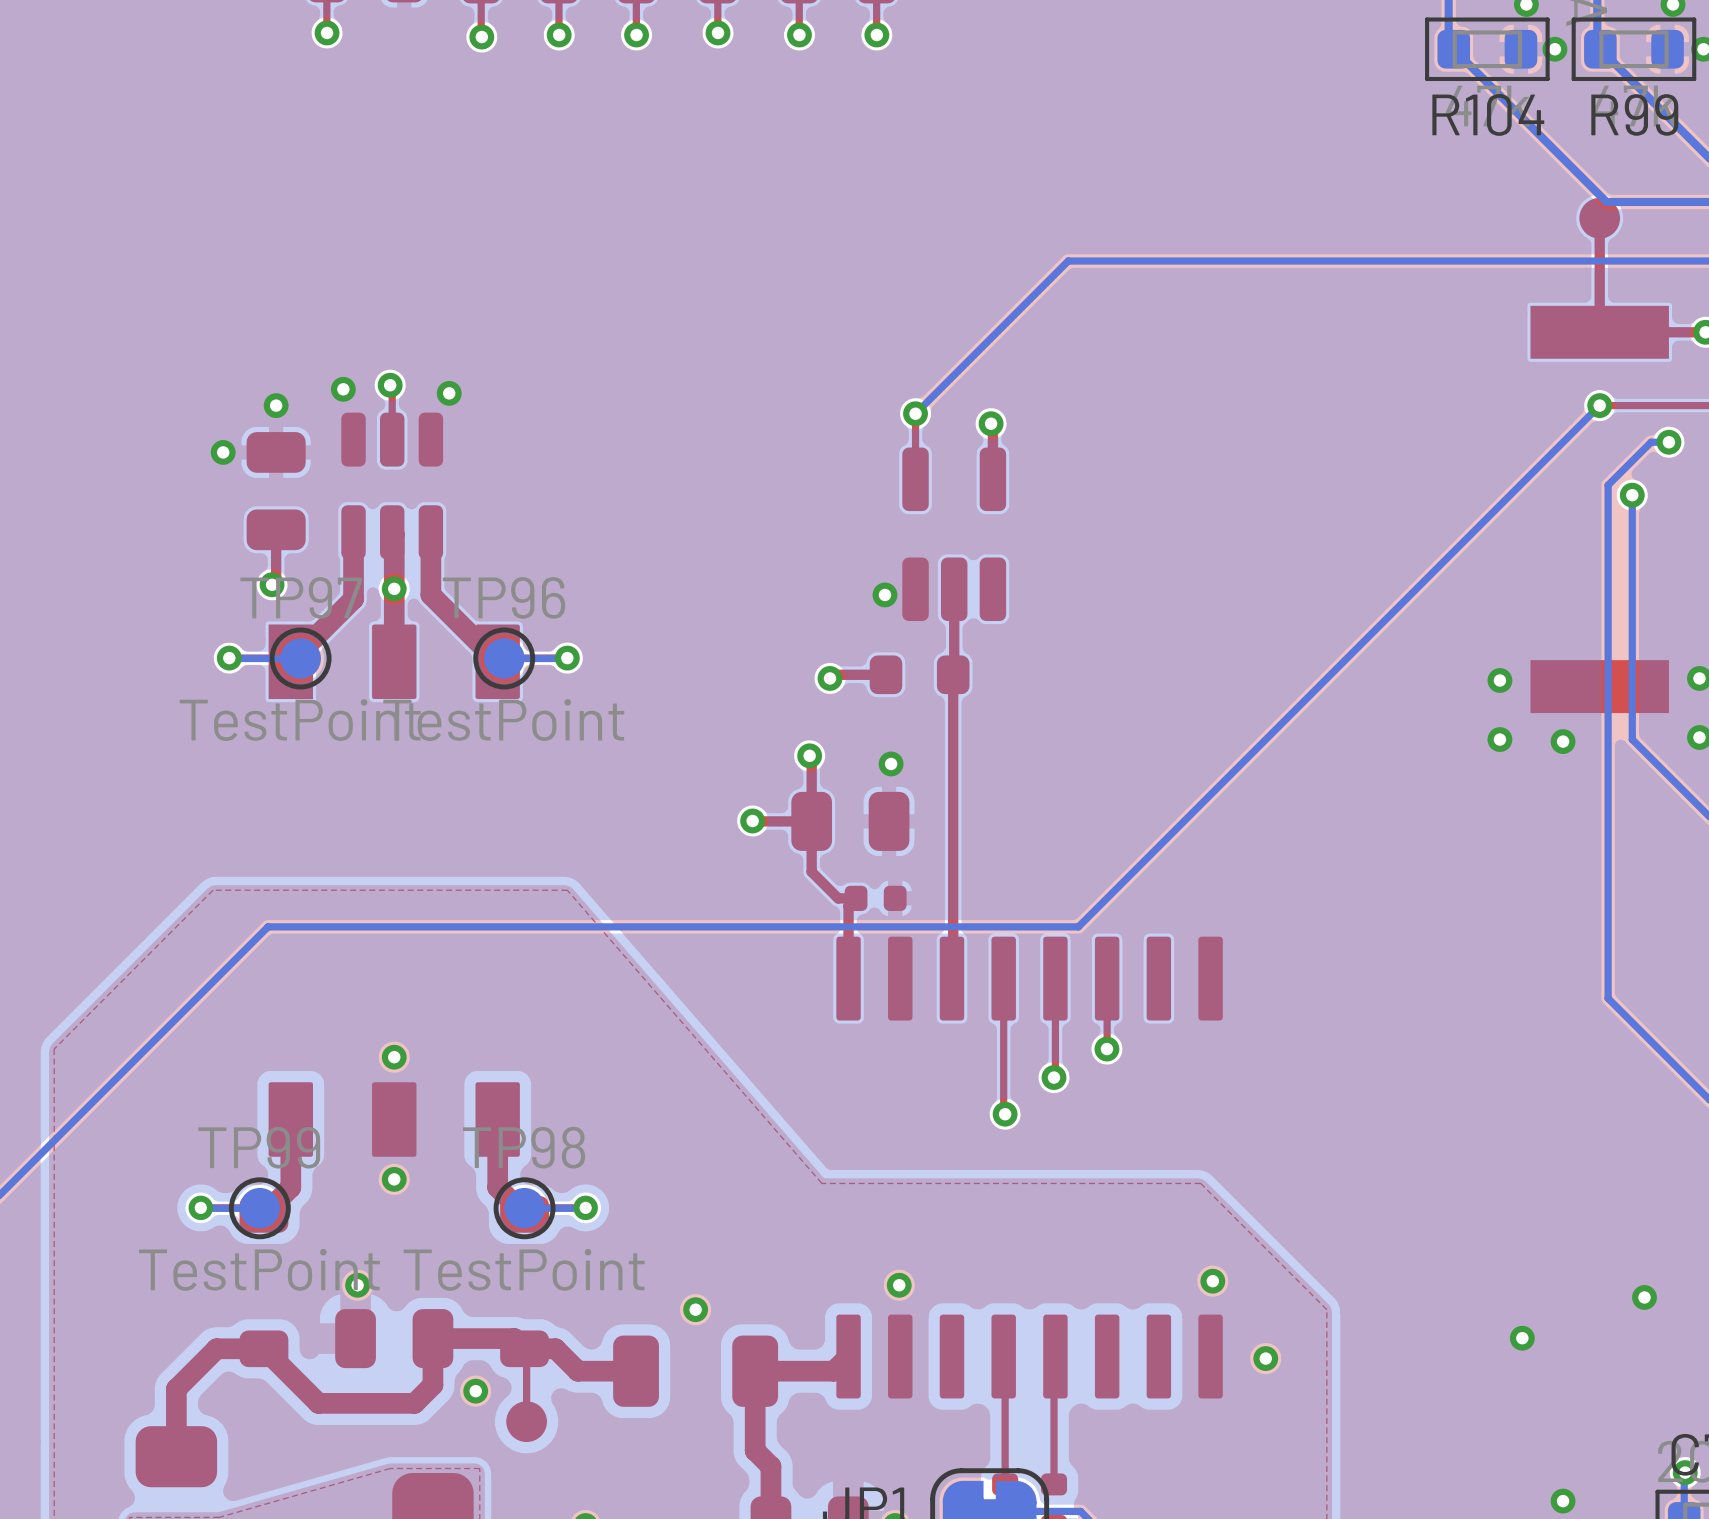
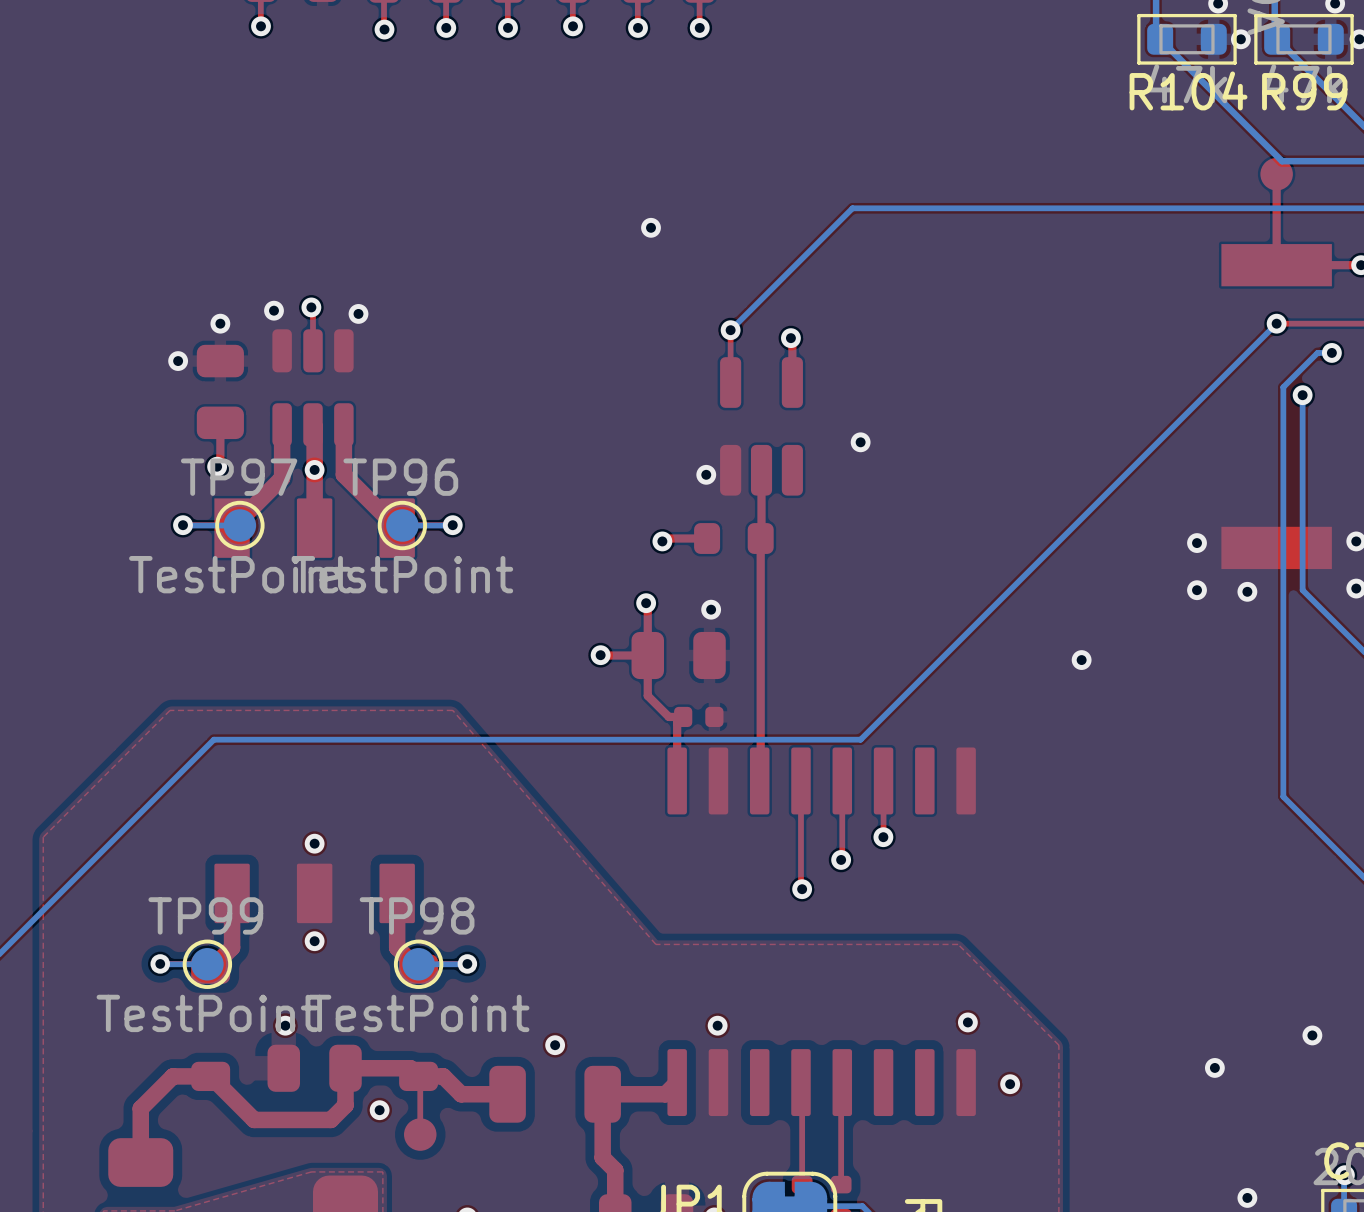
via: none -> (651, 227)
via: none -> (860, 442)
via: none -> (1081, 660)

